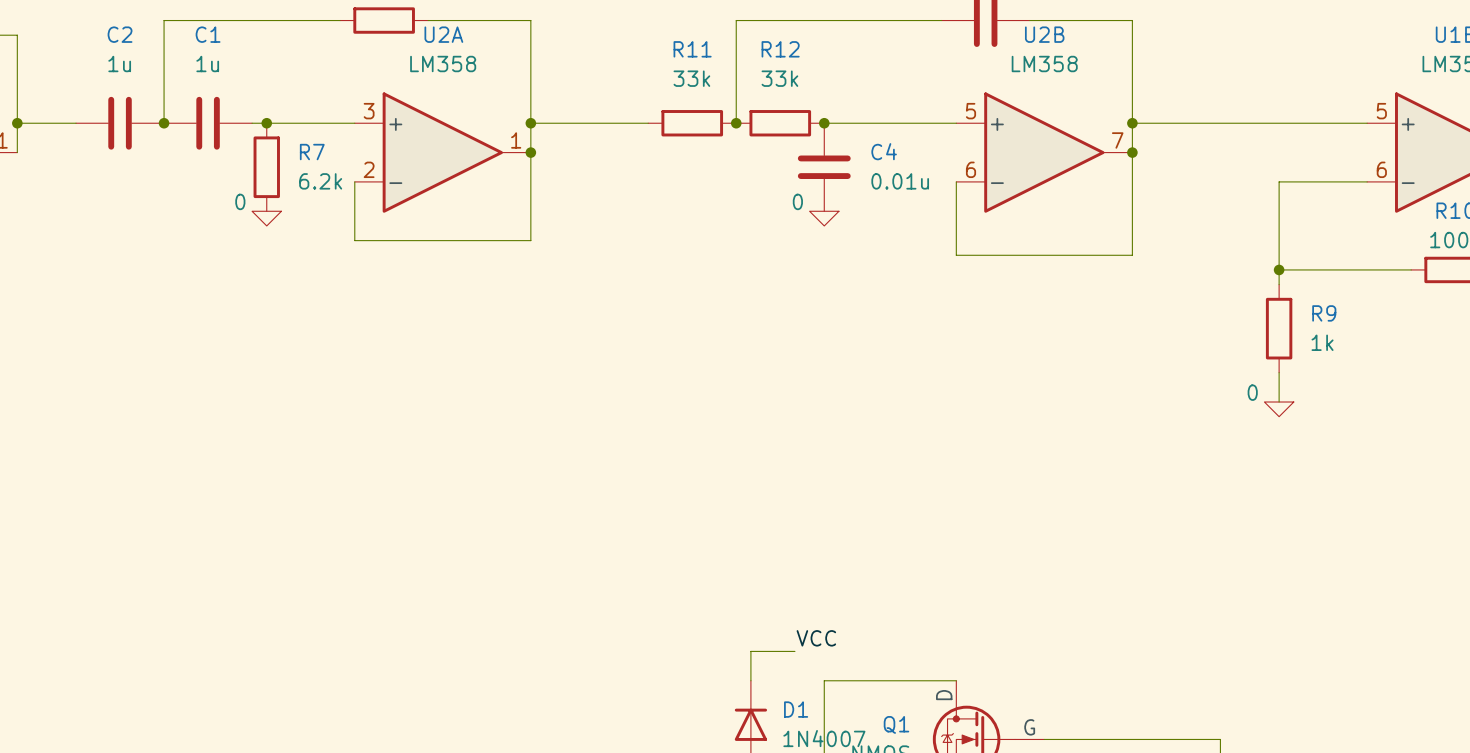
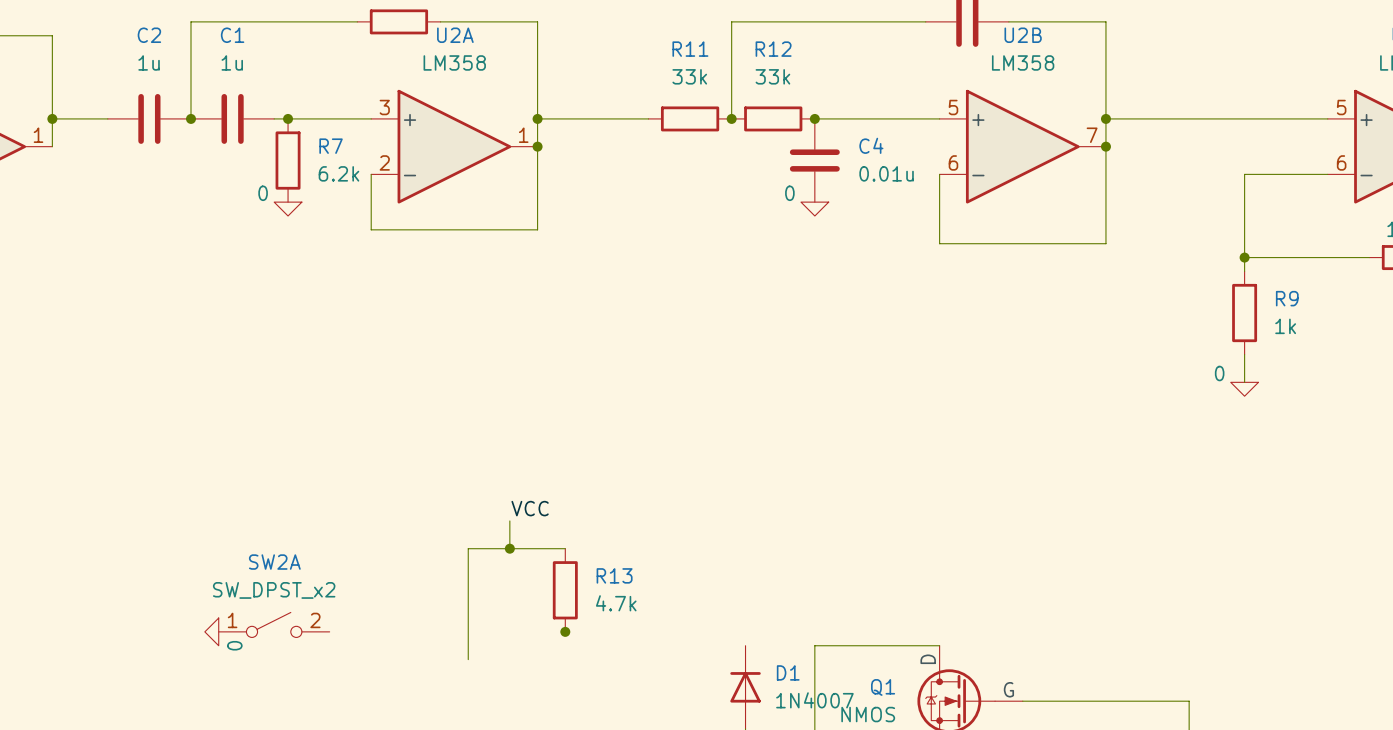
label: none -> VCC (530, 508)
wire: none -> (509, 520) (509, 548)
junction: none -> (509, 548)
wire: none -> (565, 548) (468, 548) (468, 659)
R13: none -> 4.7k (565, 590)
label: VCC (816, 638) -> none
wire: (794, 651) (750, 651) (750, 680) -> none
SW2A: none -> SW_DPST_x2 (274, 624)
power symbol: none -> 0 (211, 631)
junction: none -> (565, 631)

